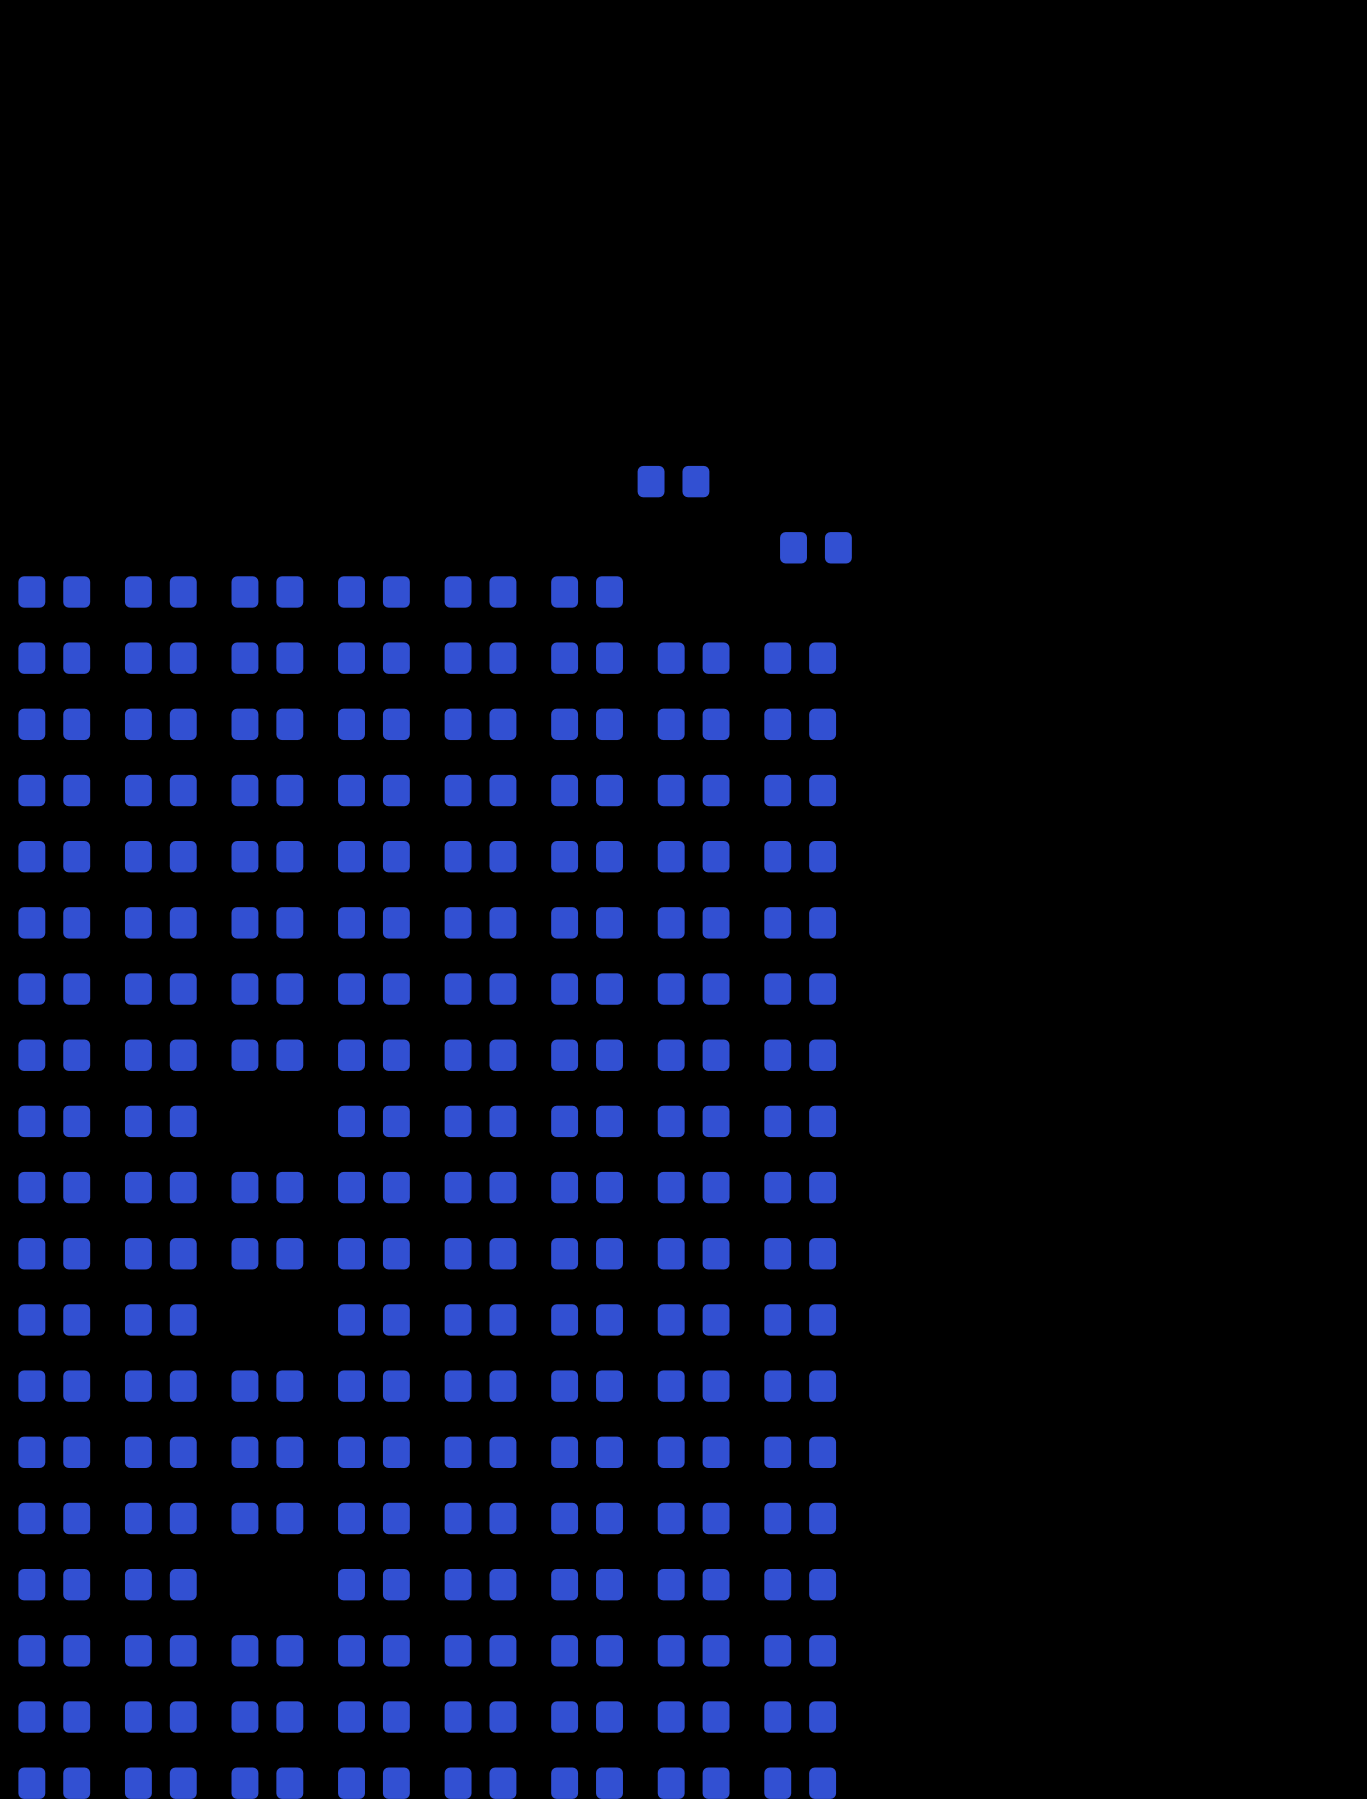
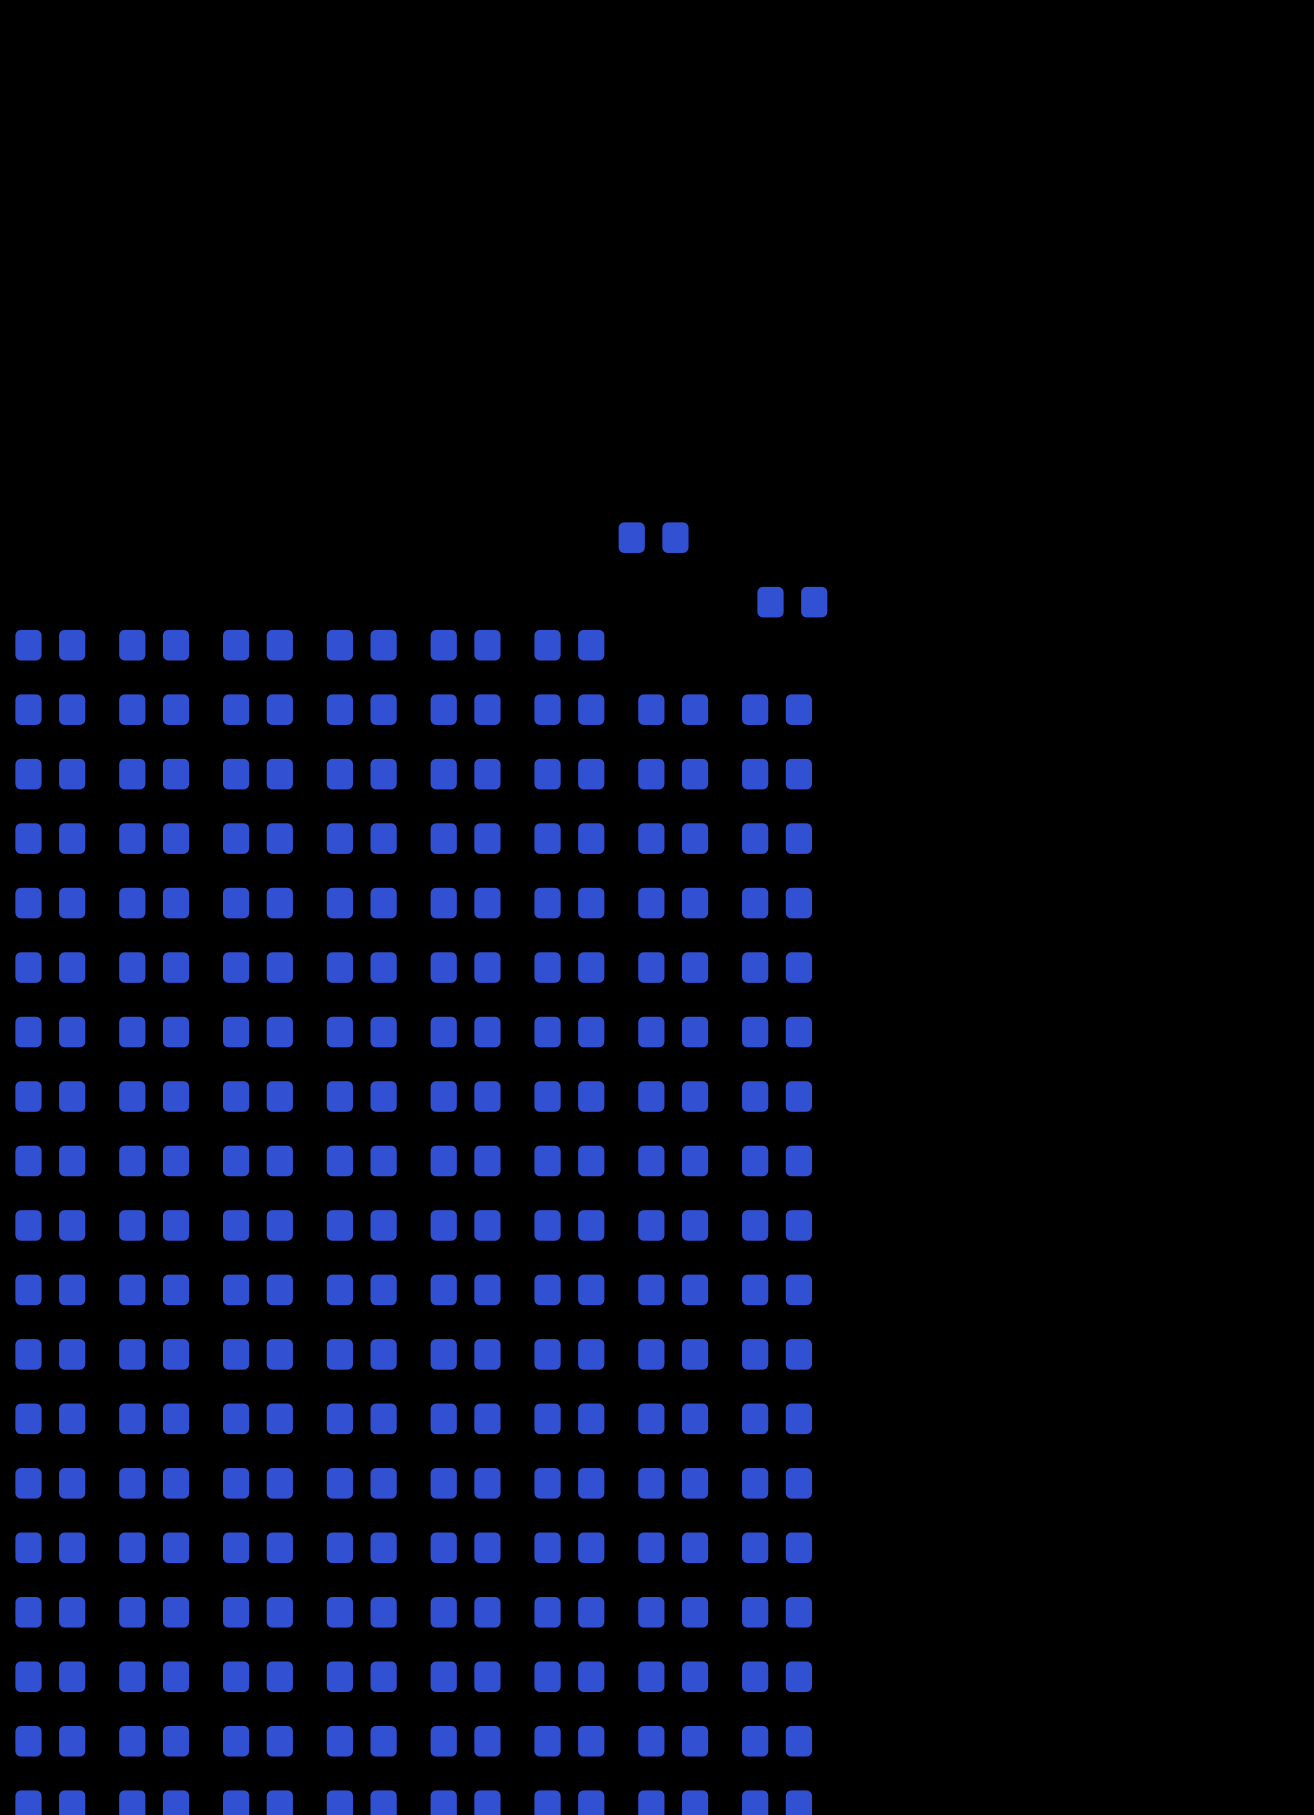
part: none -> (257, 1160)
part: none -> (257, 1354)
part: none -> (257, 1612)

